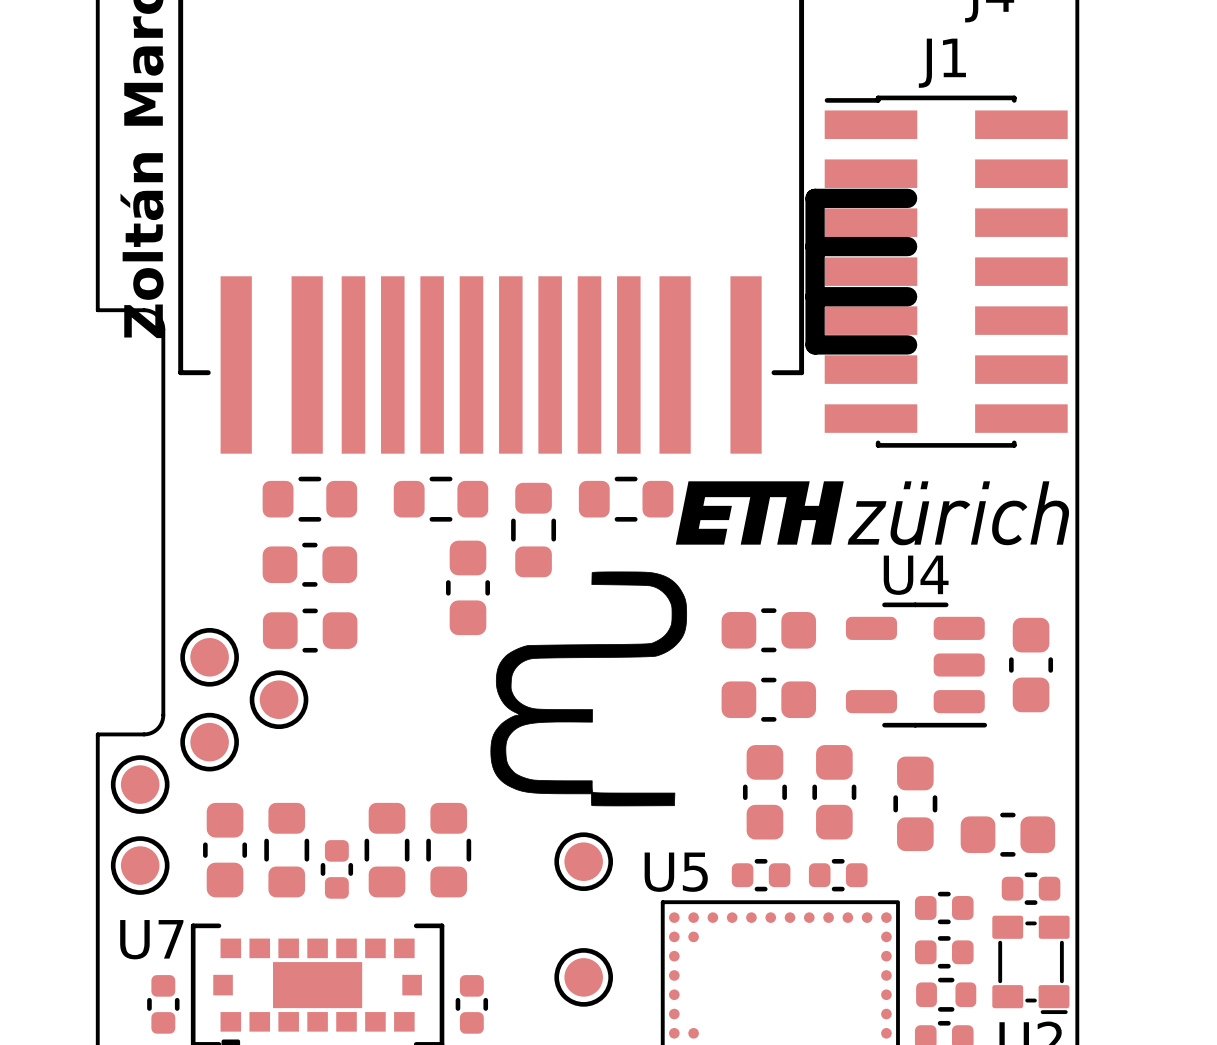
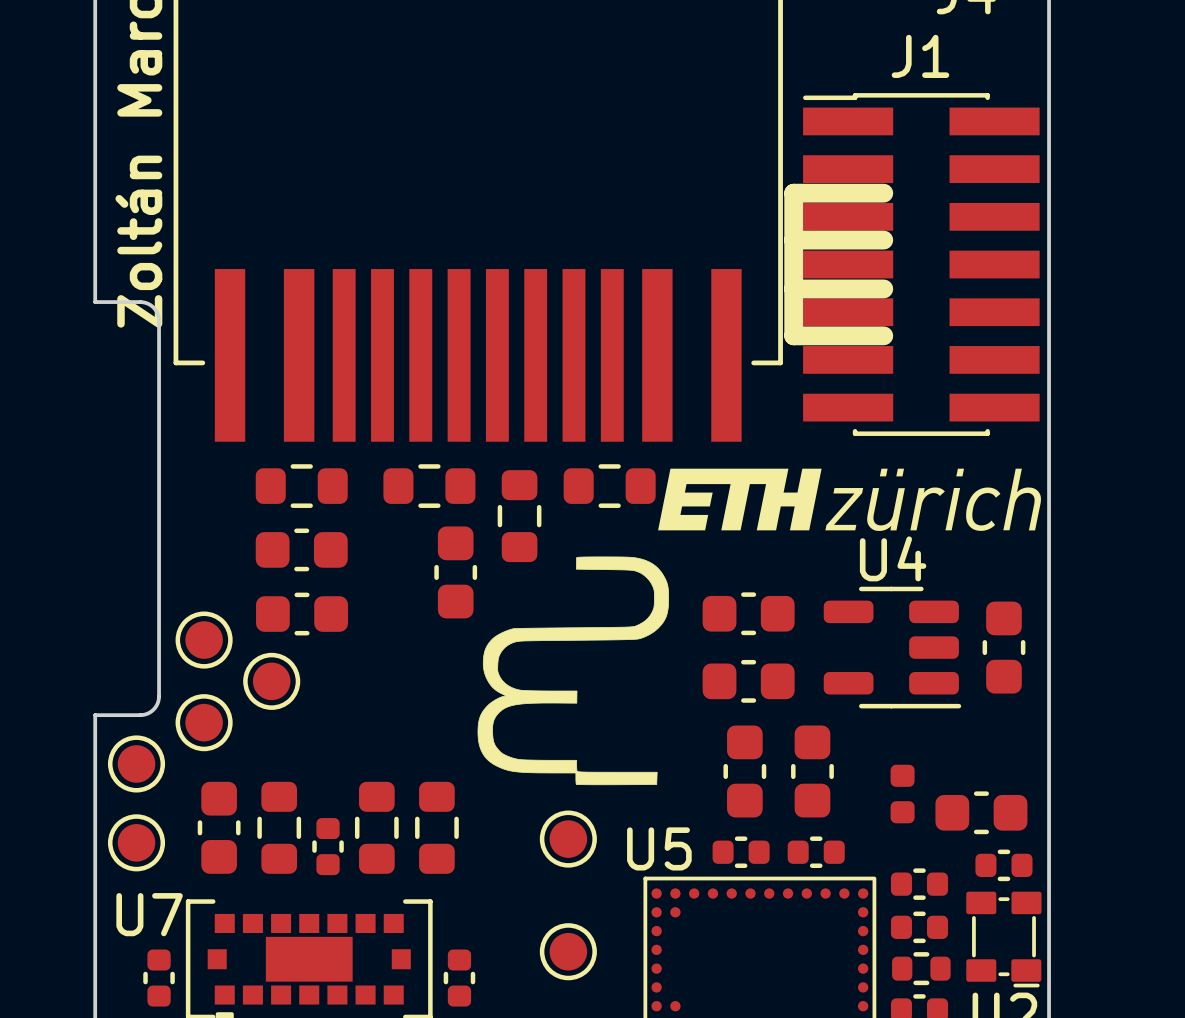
part footprint: [893, 756, 938, 852] -> [890, 764, 915, 824]

